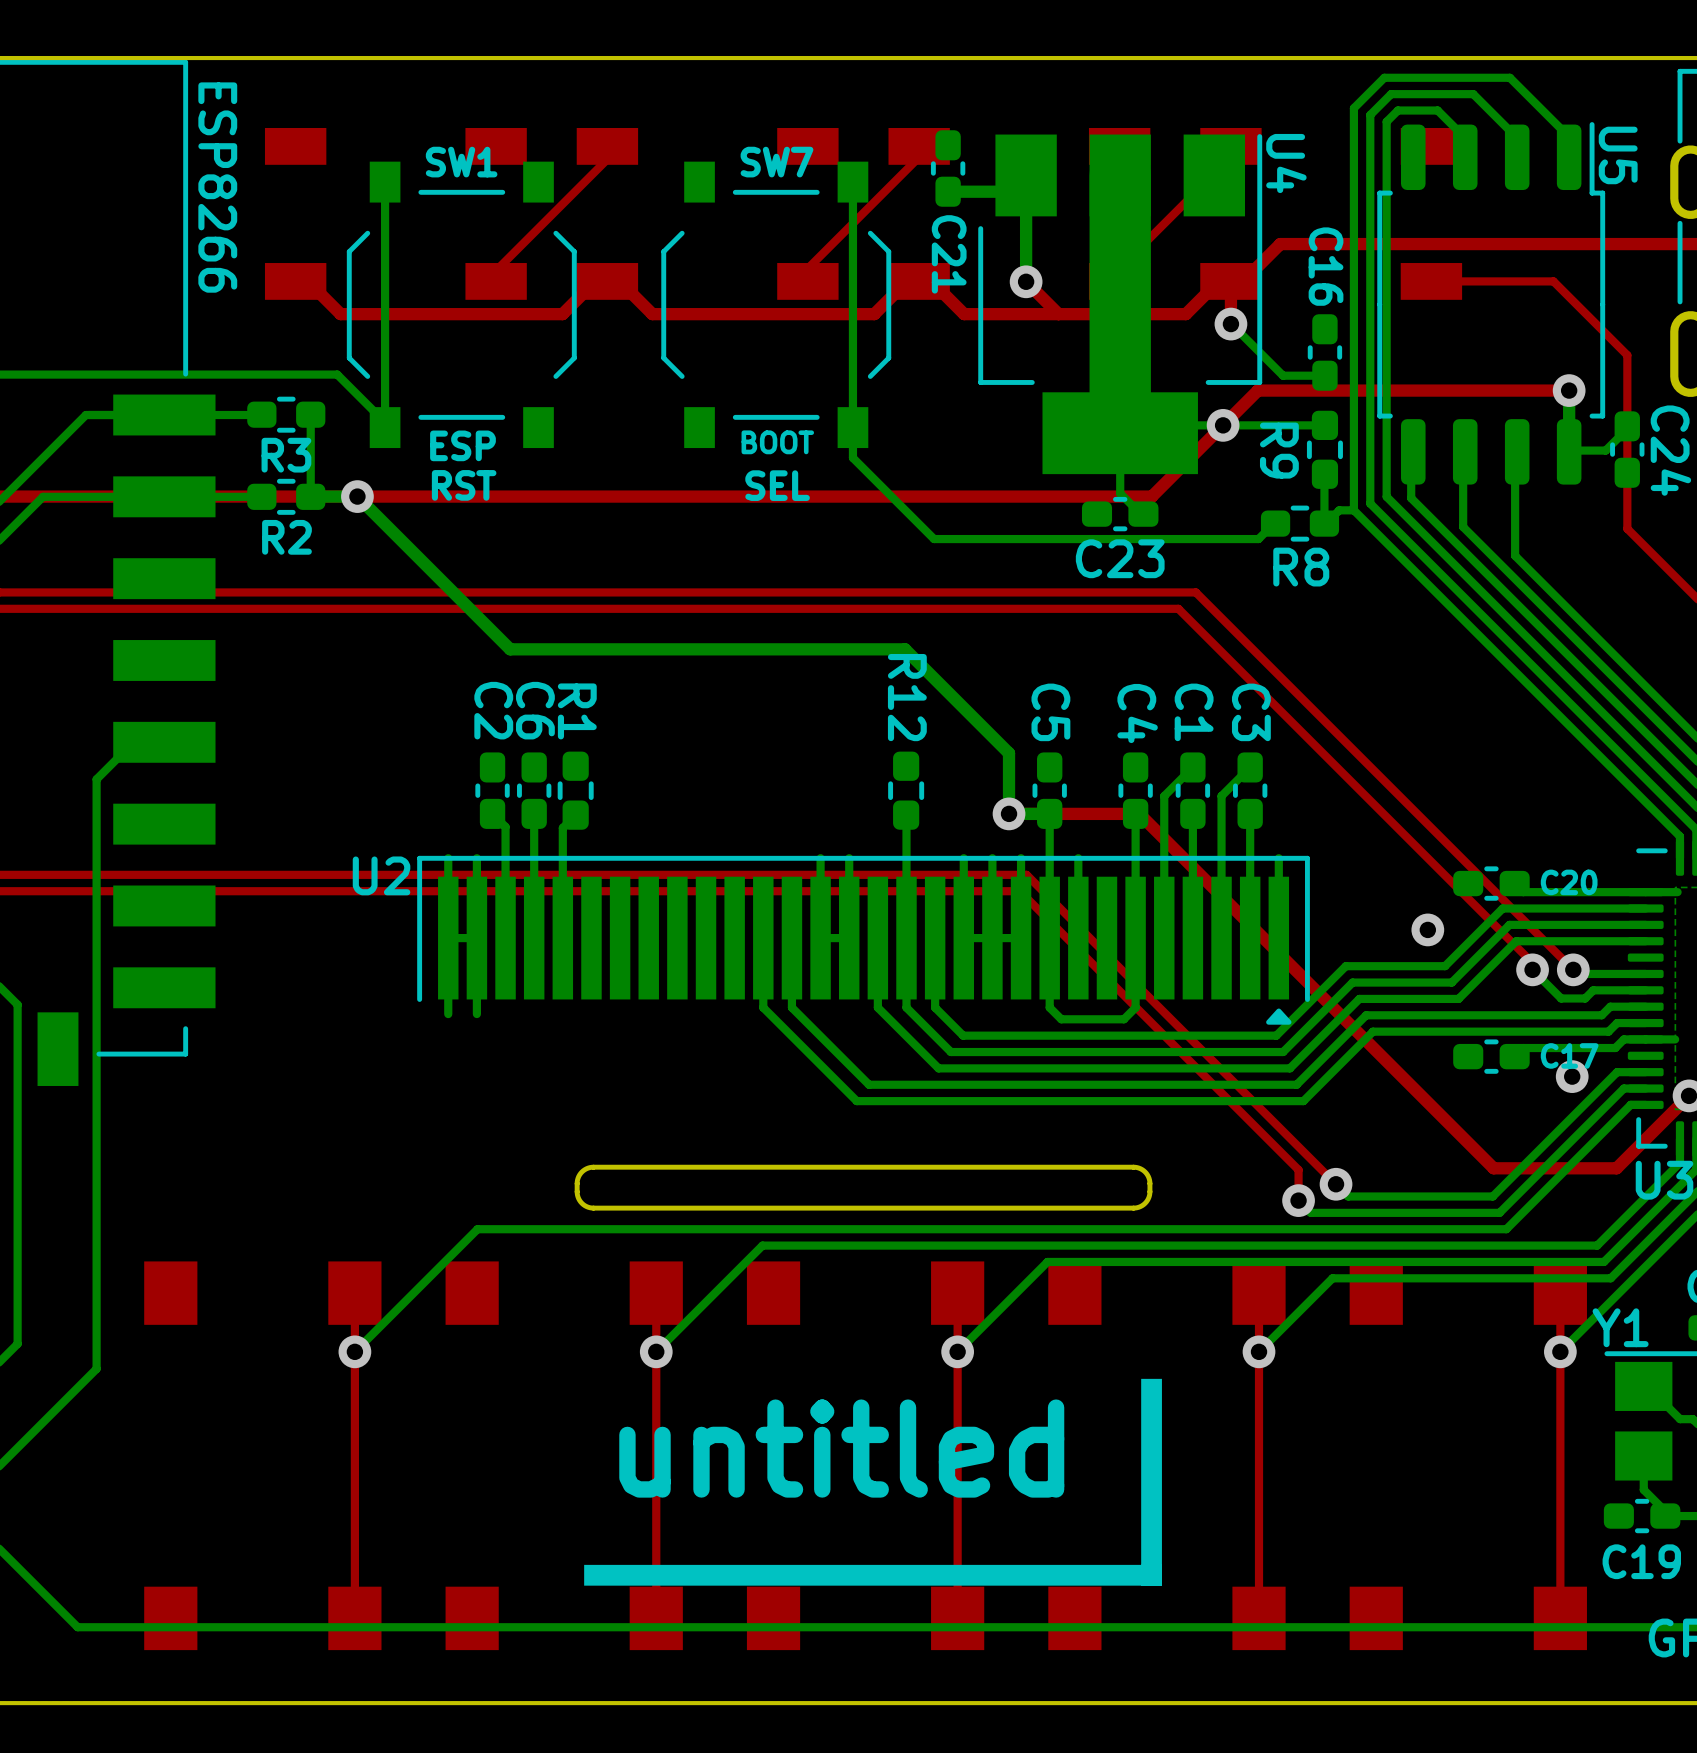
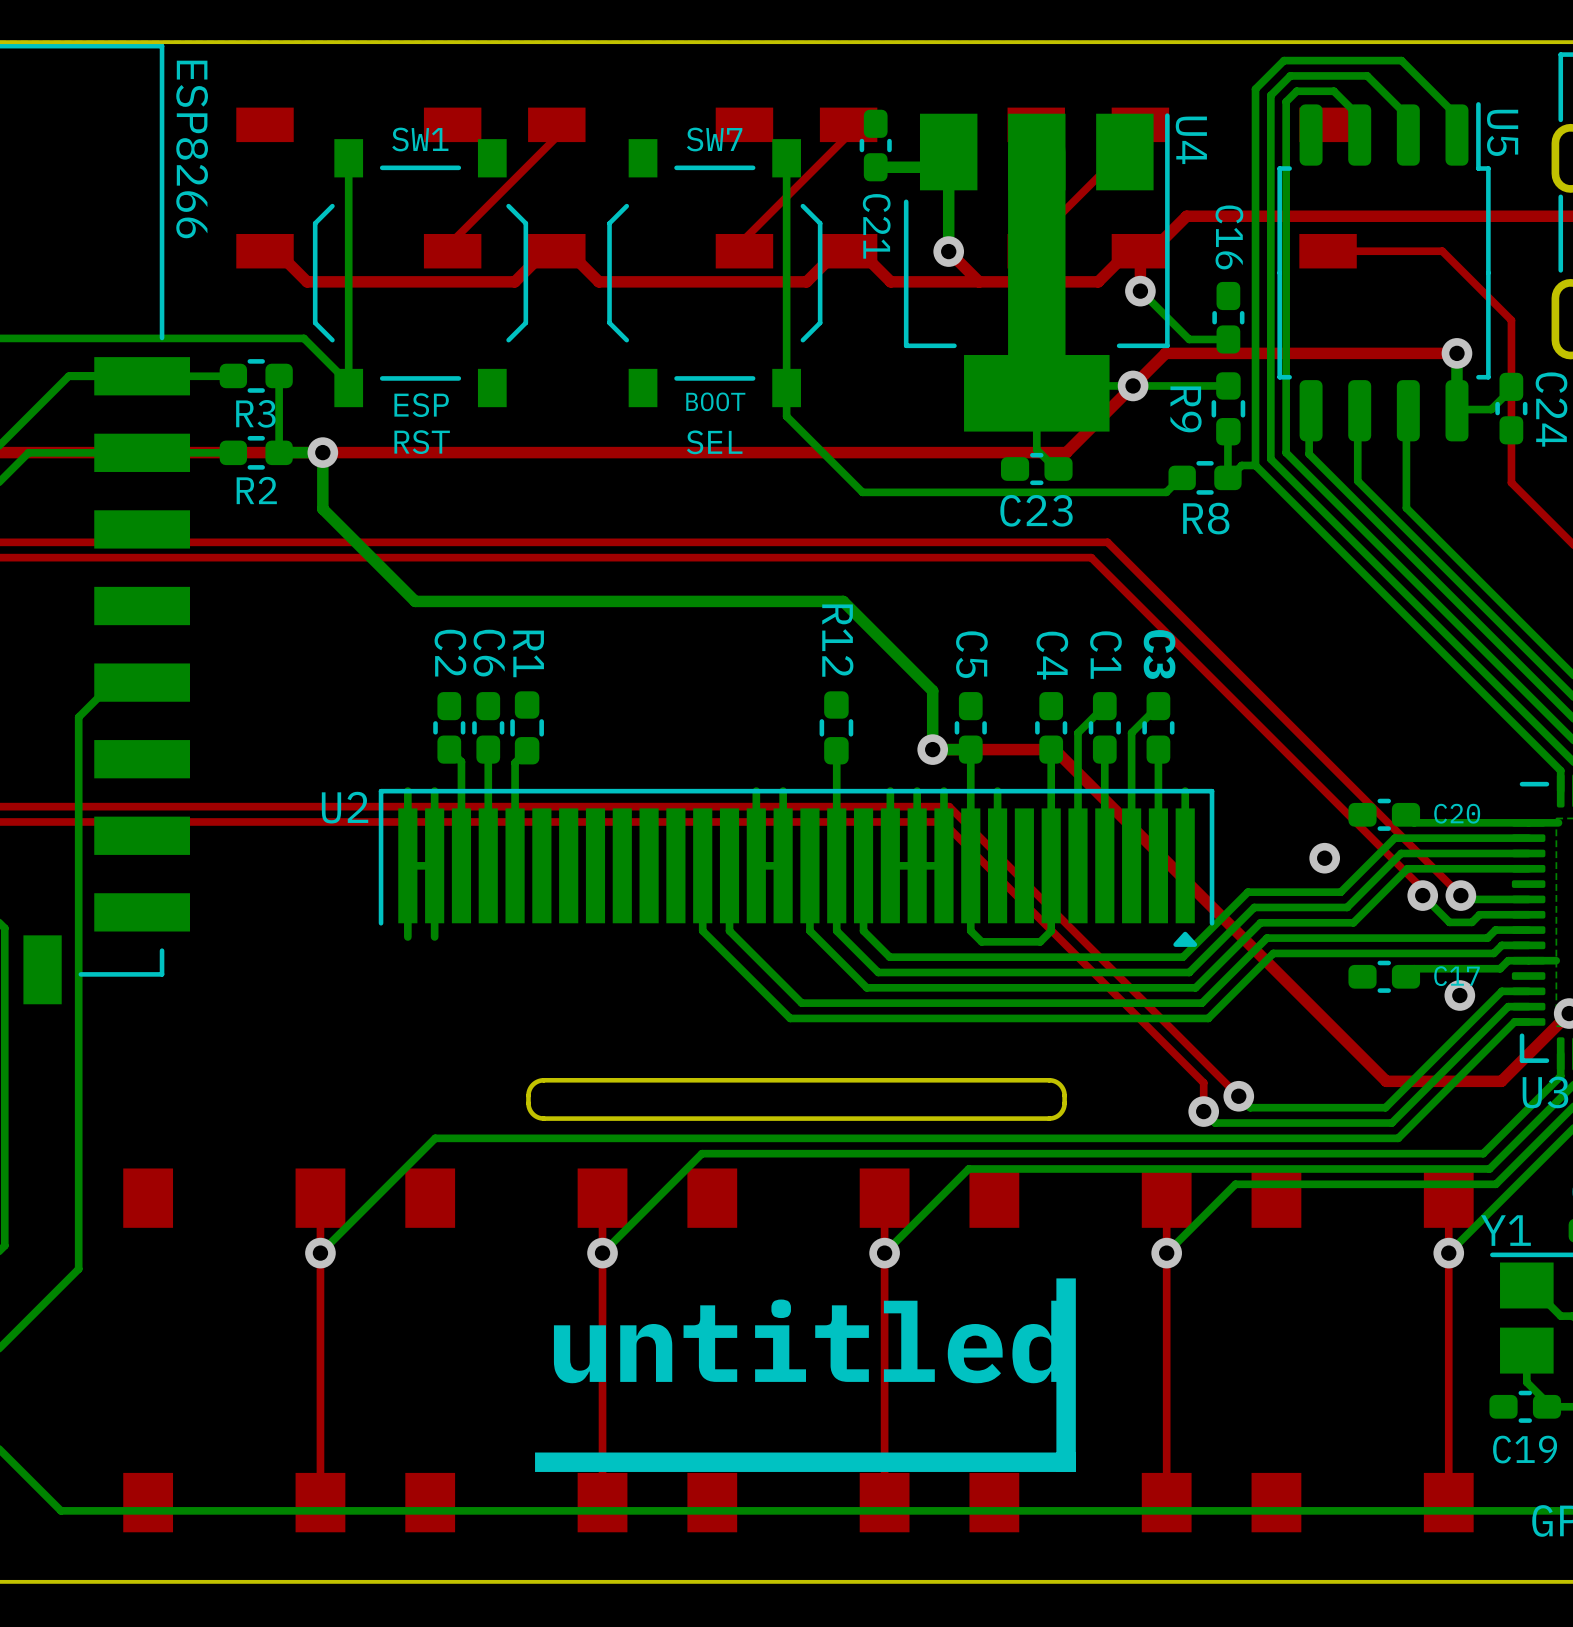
bottom track: (357, 496) (510, 649) (905, 649) (1009, 753) -> (322, 452) (322, 509) (415, 601) (843, 601) (932, 692)

